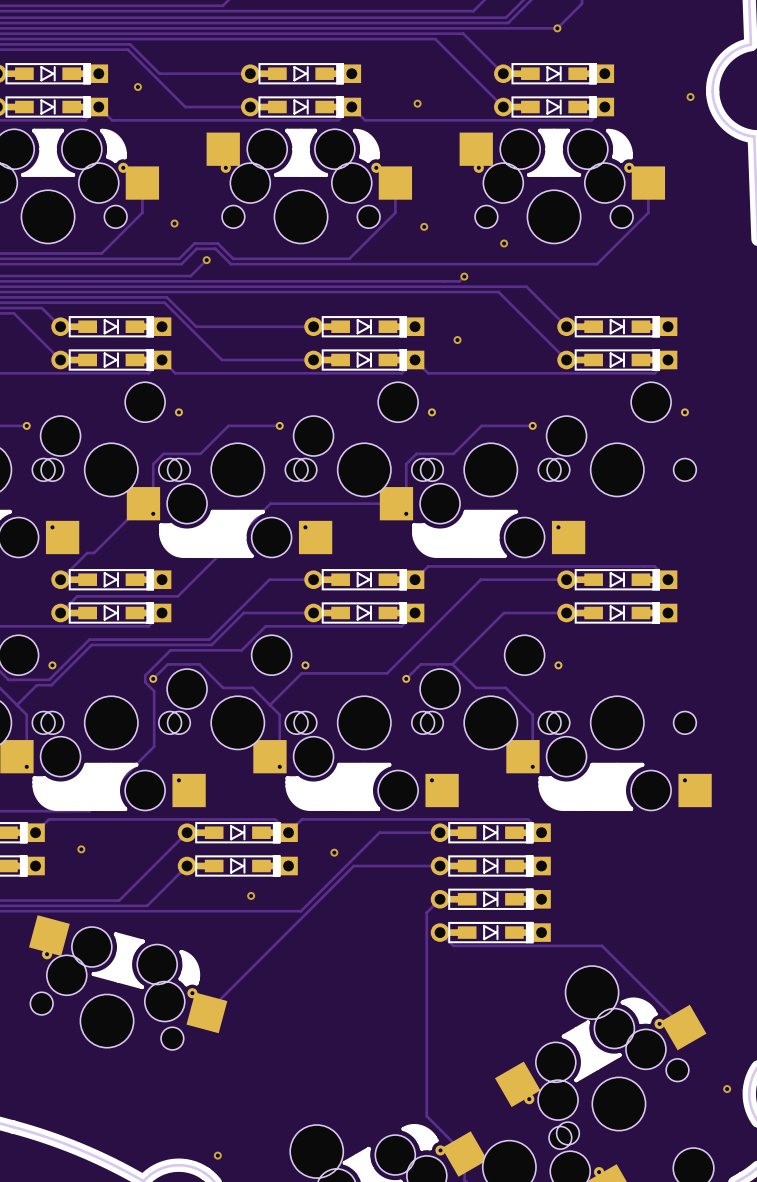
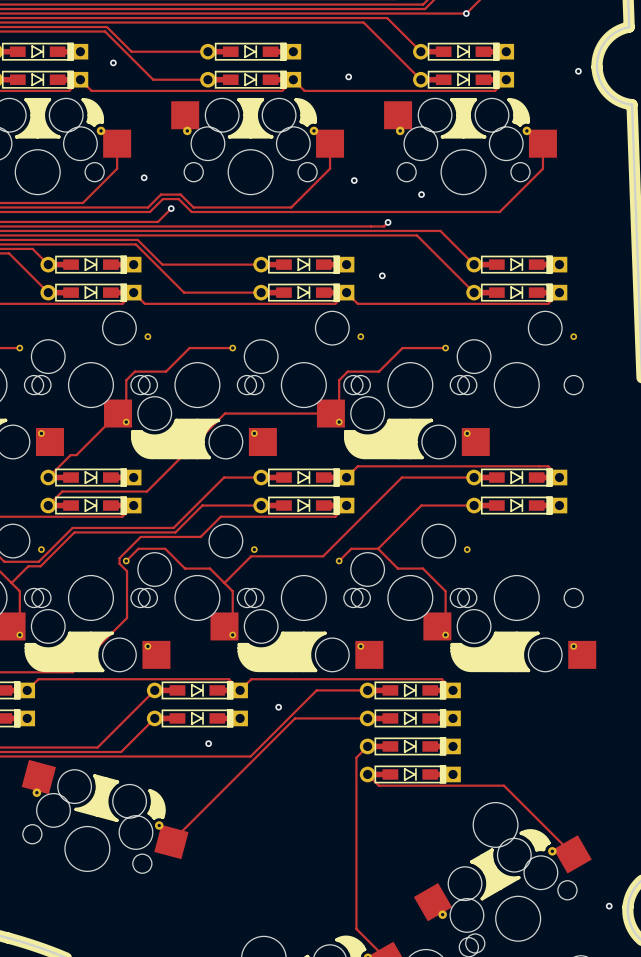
via: (81, 849) -> none

